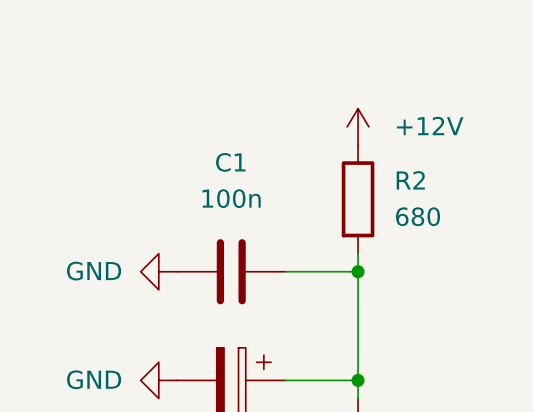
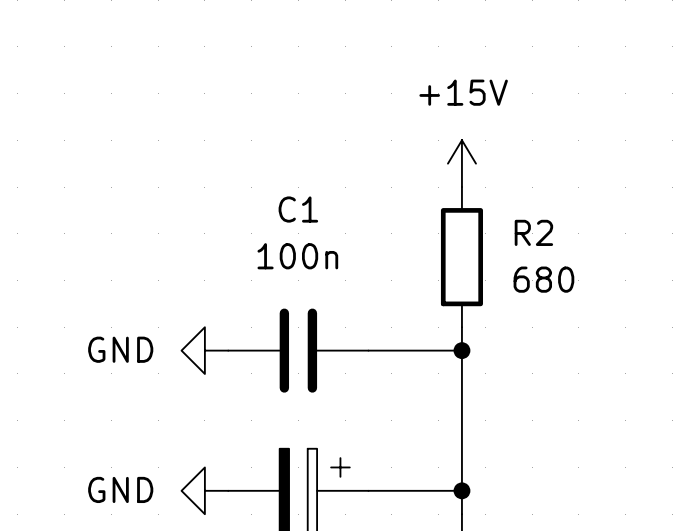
power symbol: +12V (358, 126) -> +15V (461, 163)

